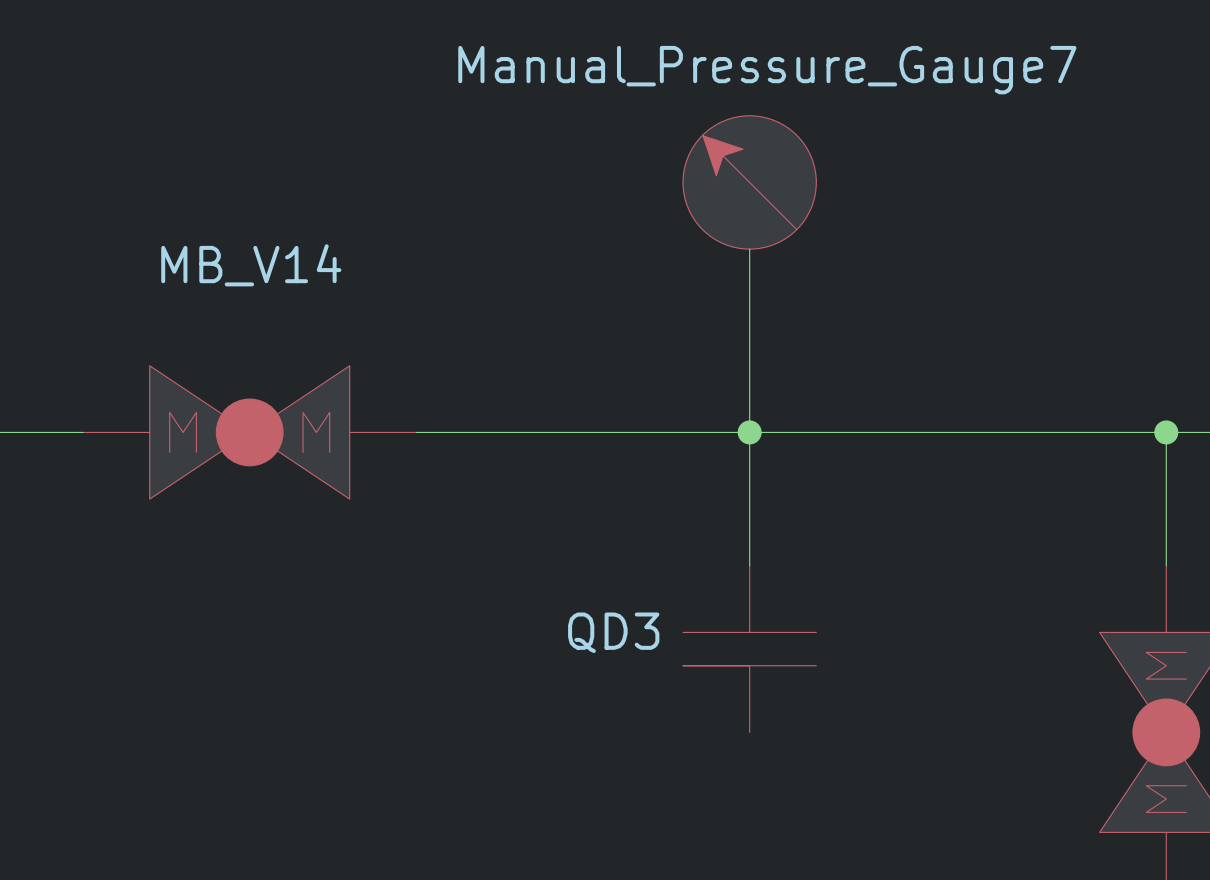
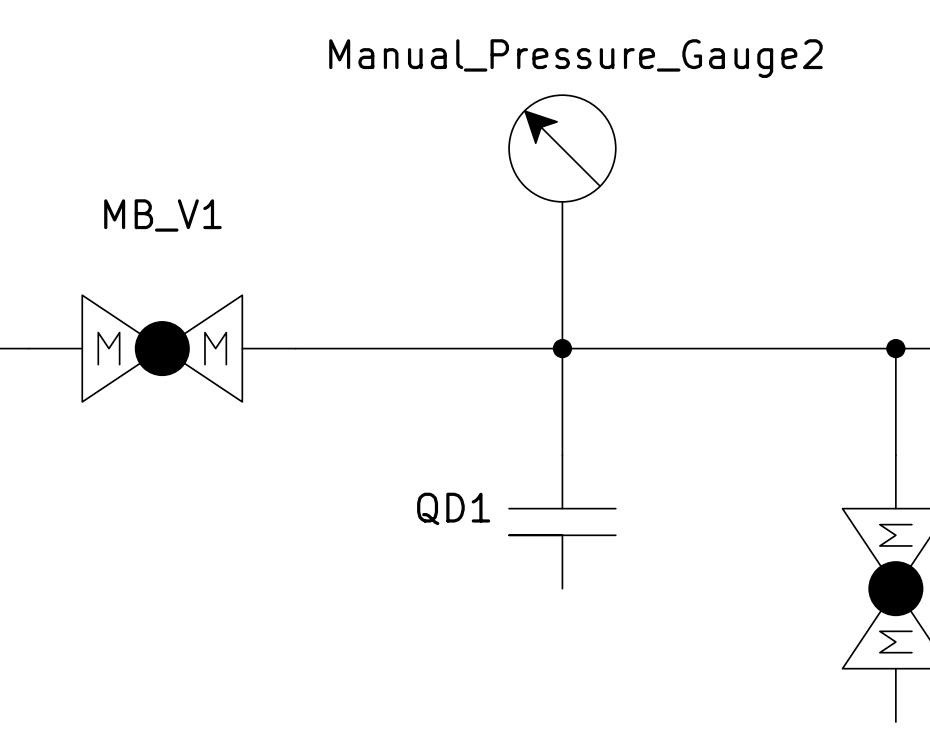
Manual_Pressure_Gauge7 name: Manual_Pressure_Gauge7 (767, 70) -> Manual_Pressure_Gauge2 (575, 58)
MB_V14 name: MB_V14 (251, 265) -> MB_V1 (162, 215)
QD3 name: QD3 (613, 632) -> QD1 (453, 508)

